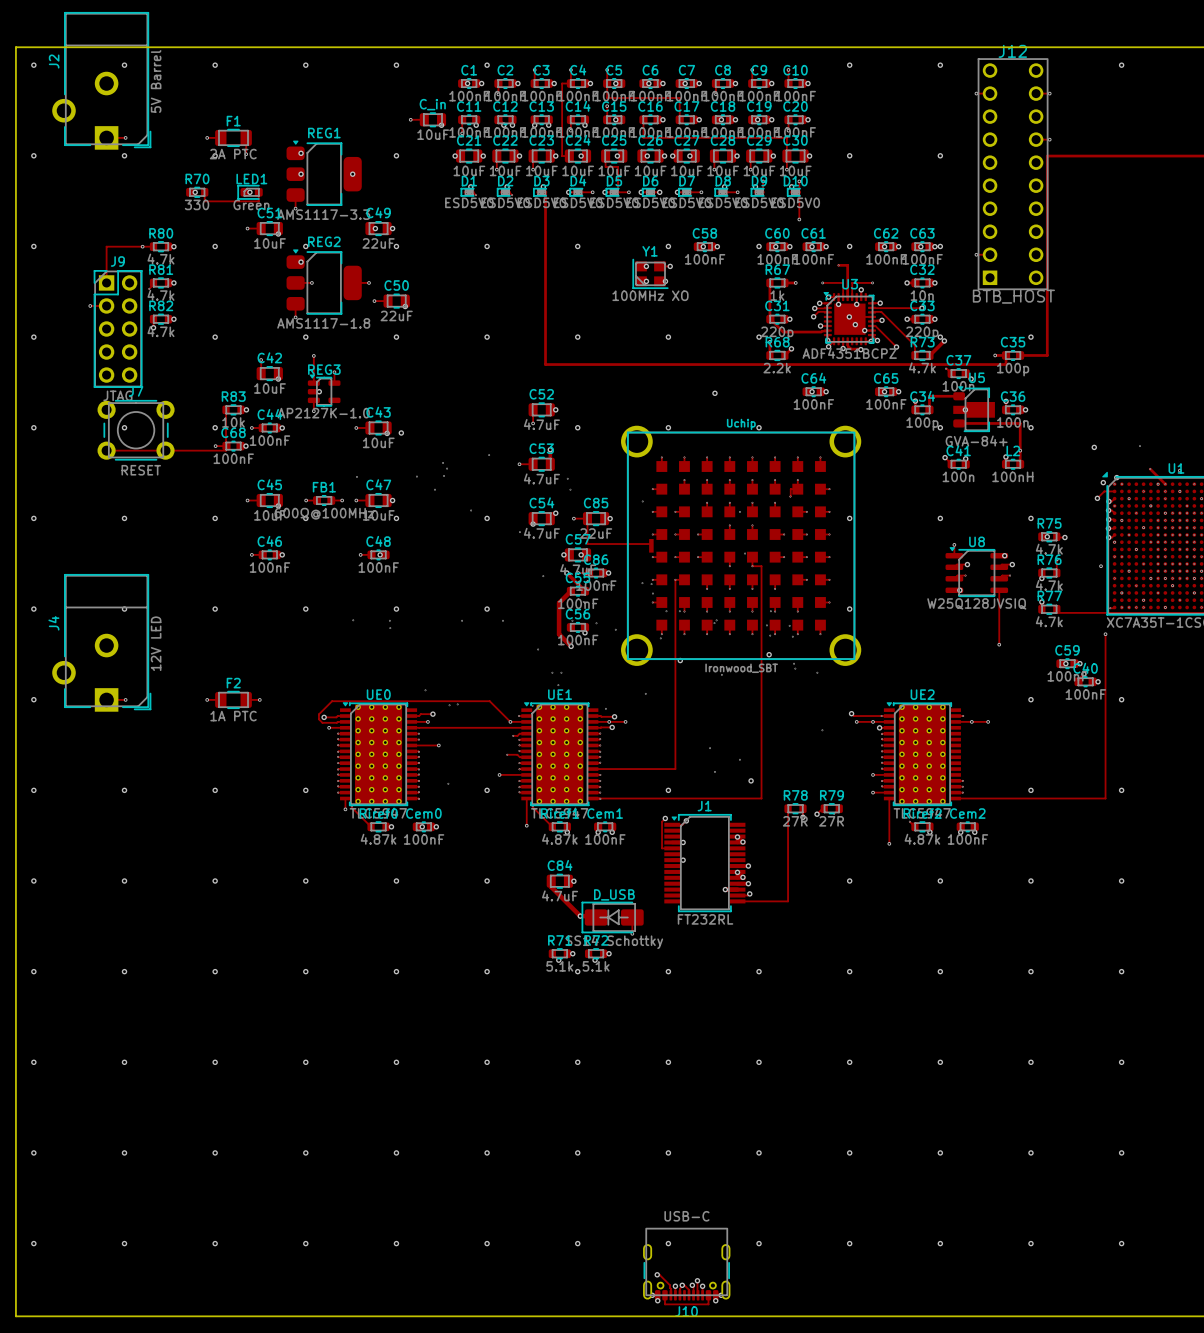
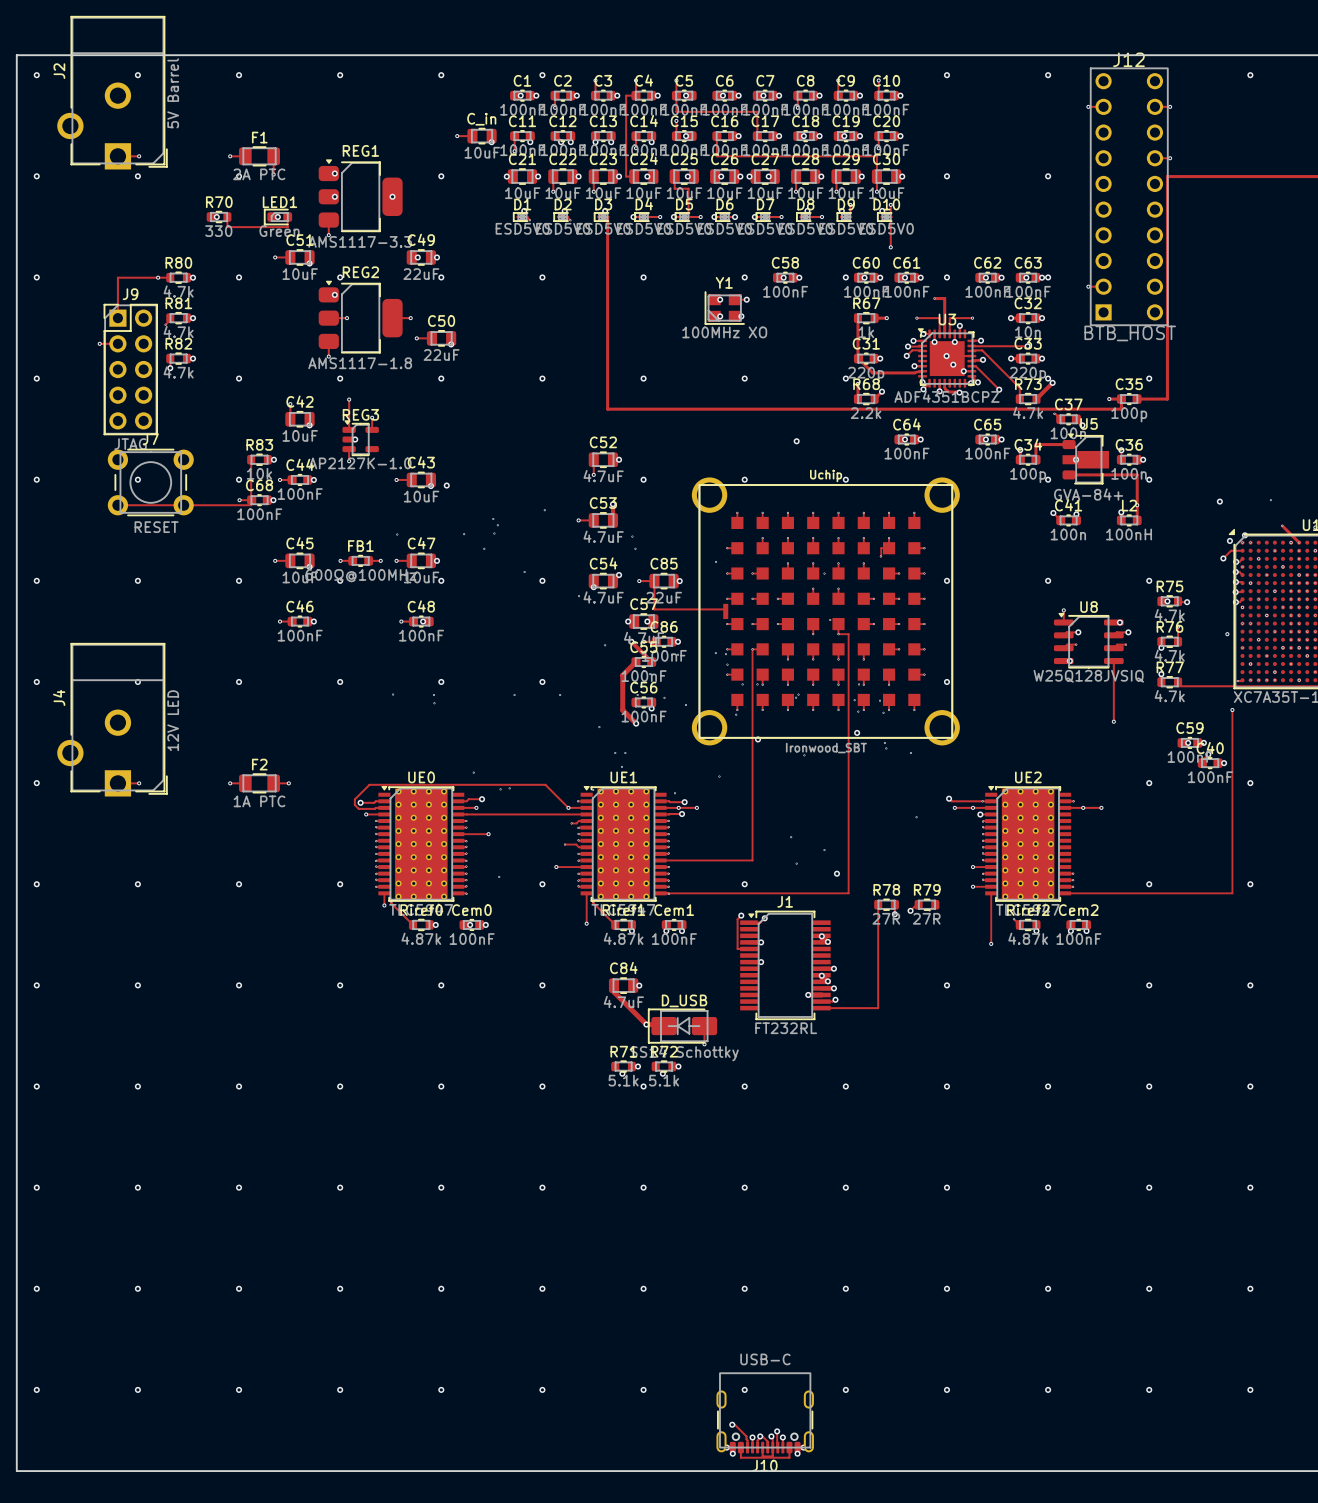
track: none -> (762, 1447) (762, 1456) (772, 1456) (772, 1447)

